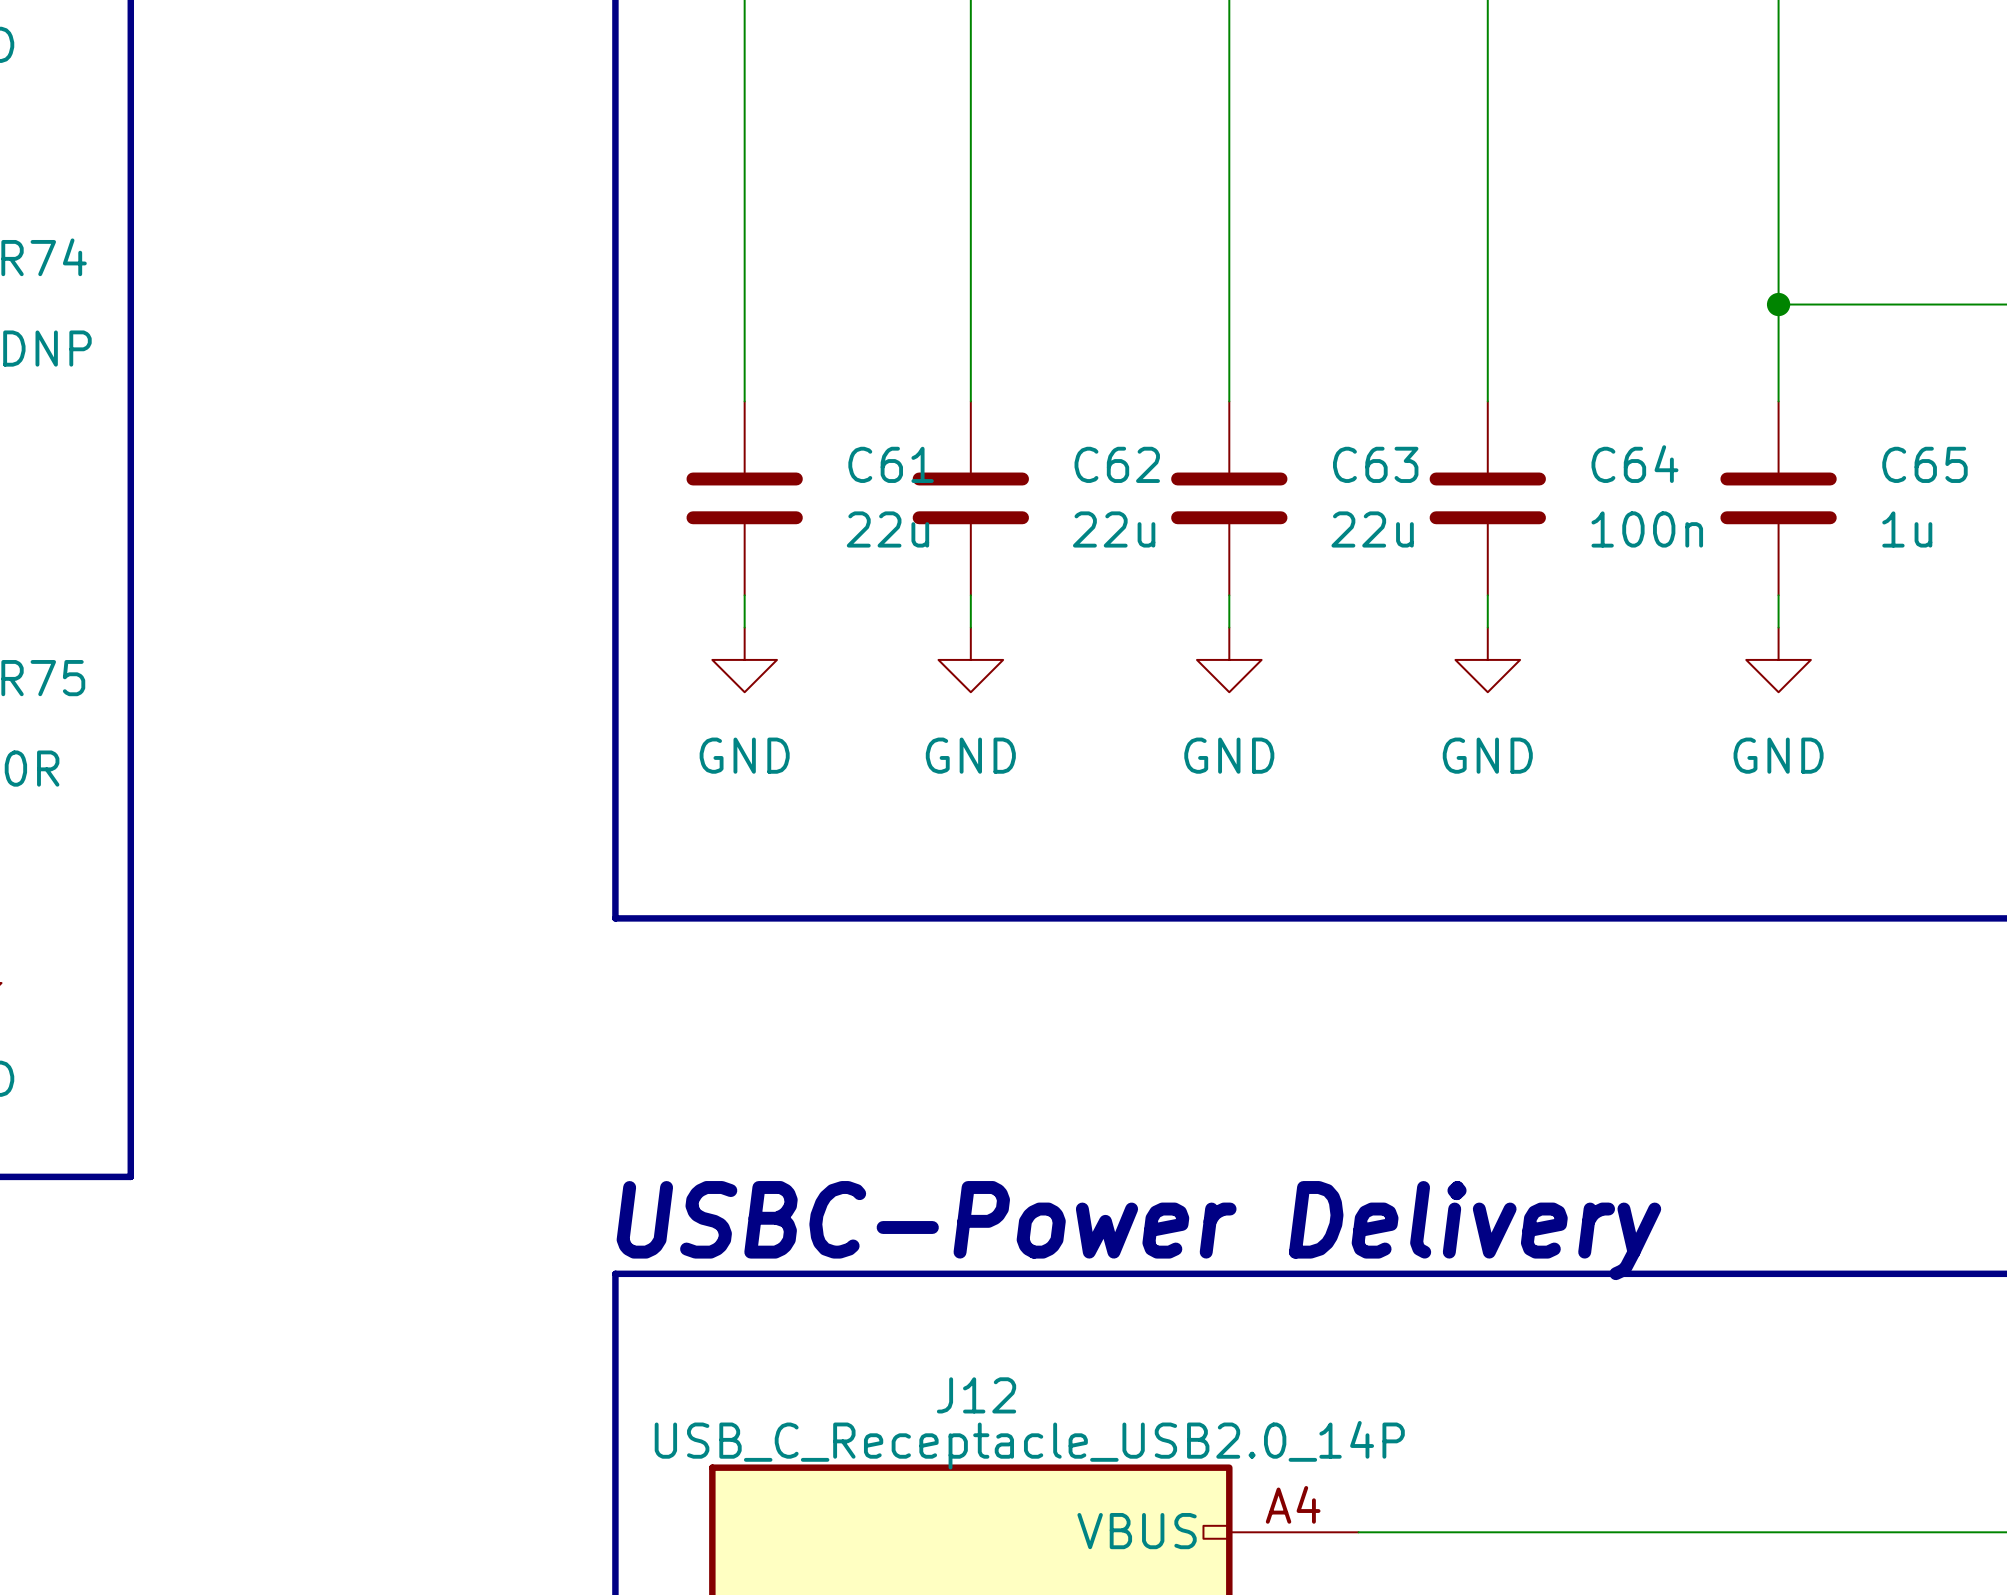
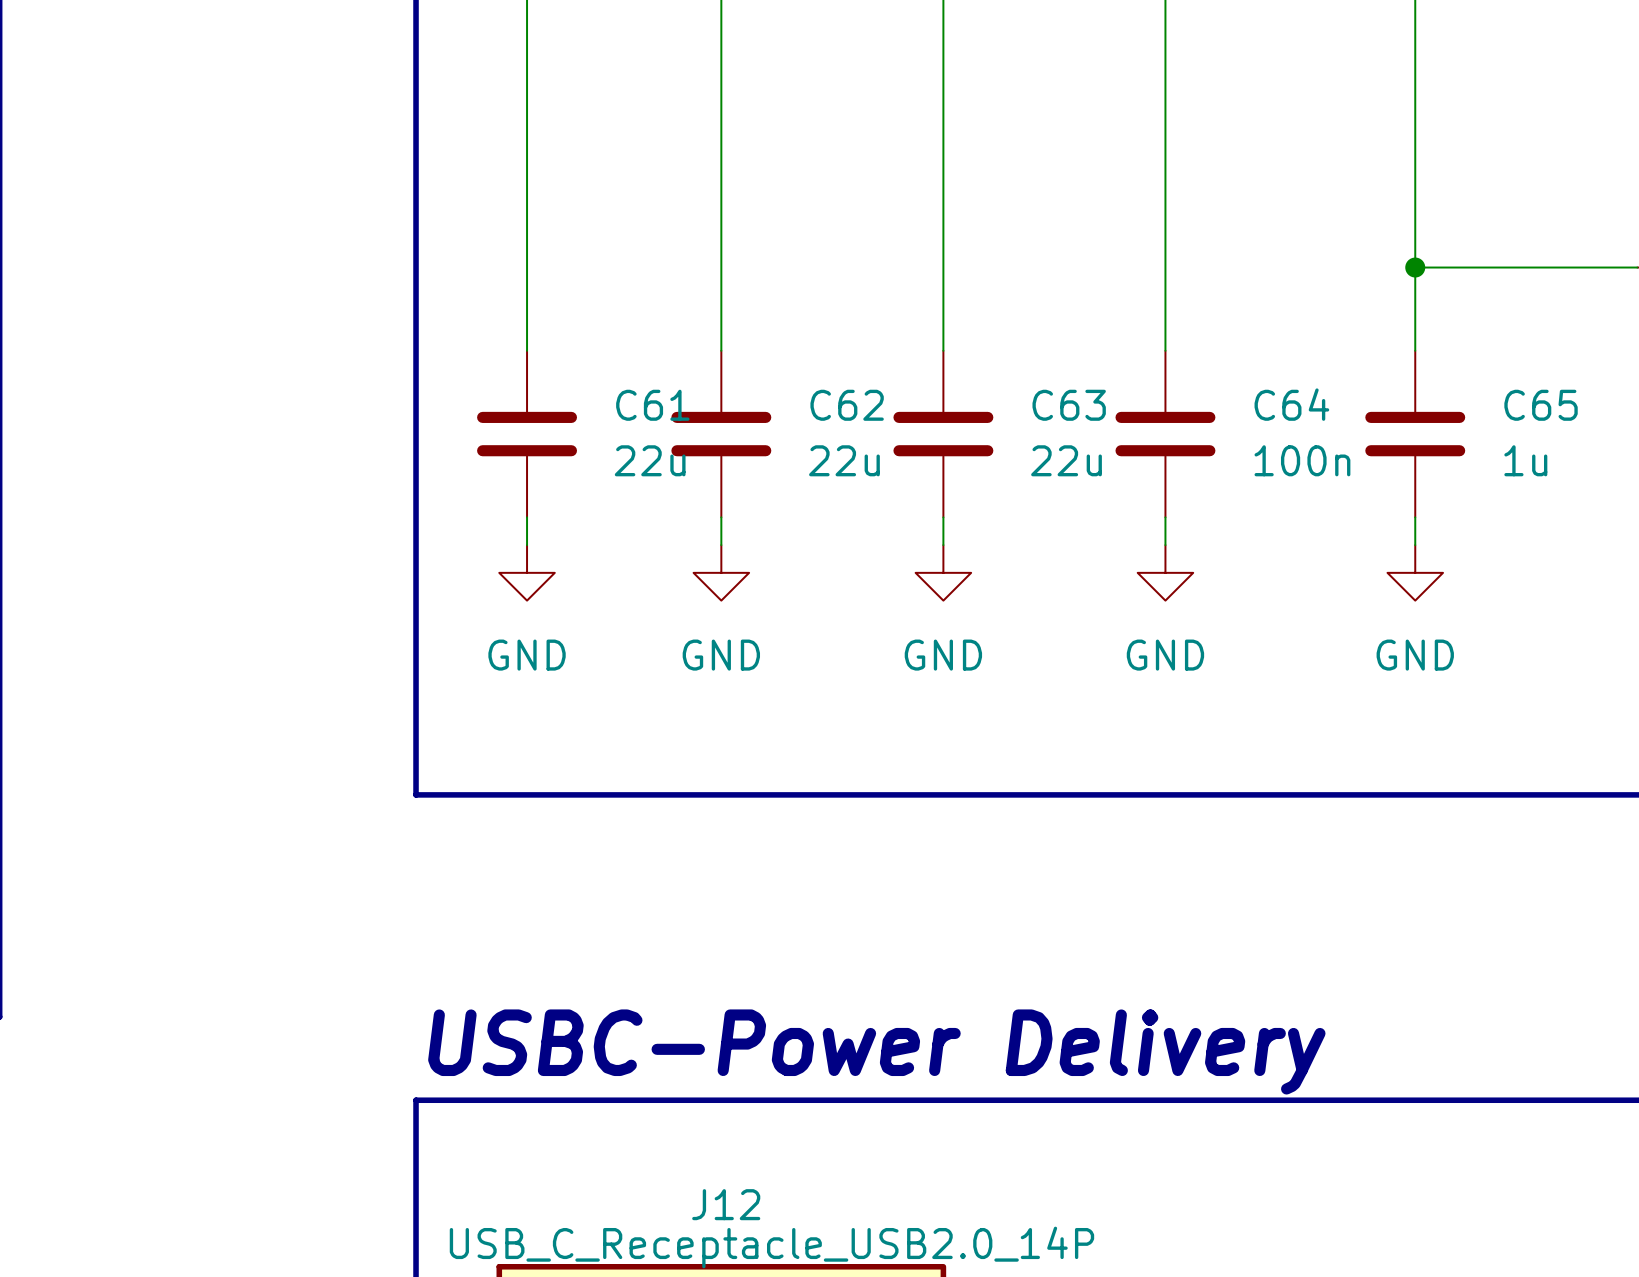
text position: USBC-Power Delivery (1138, 1230) -> USBC-Power Delivery (876, 1051)

